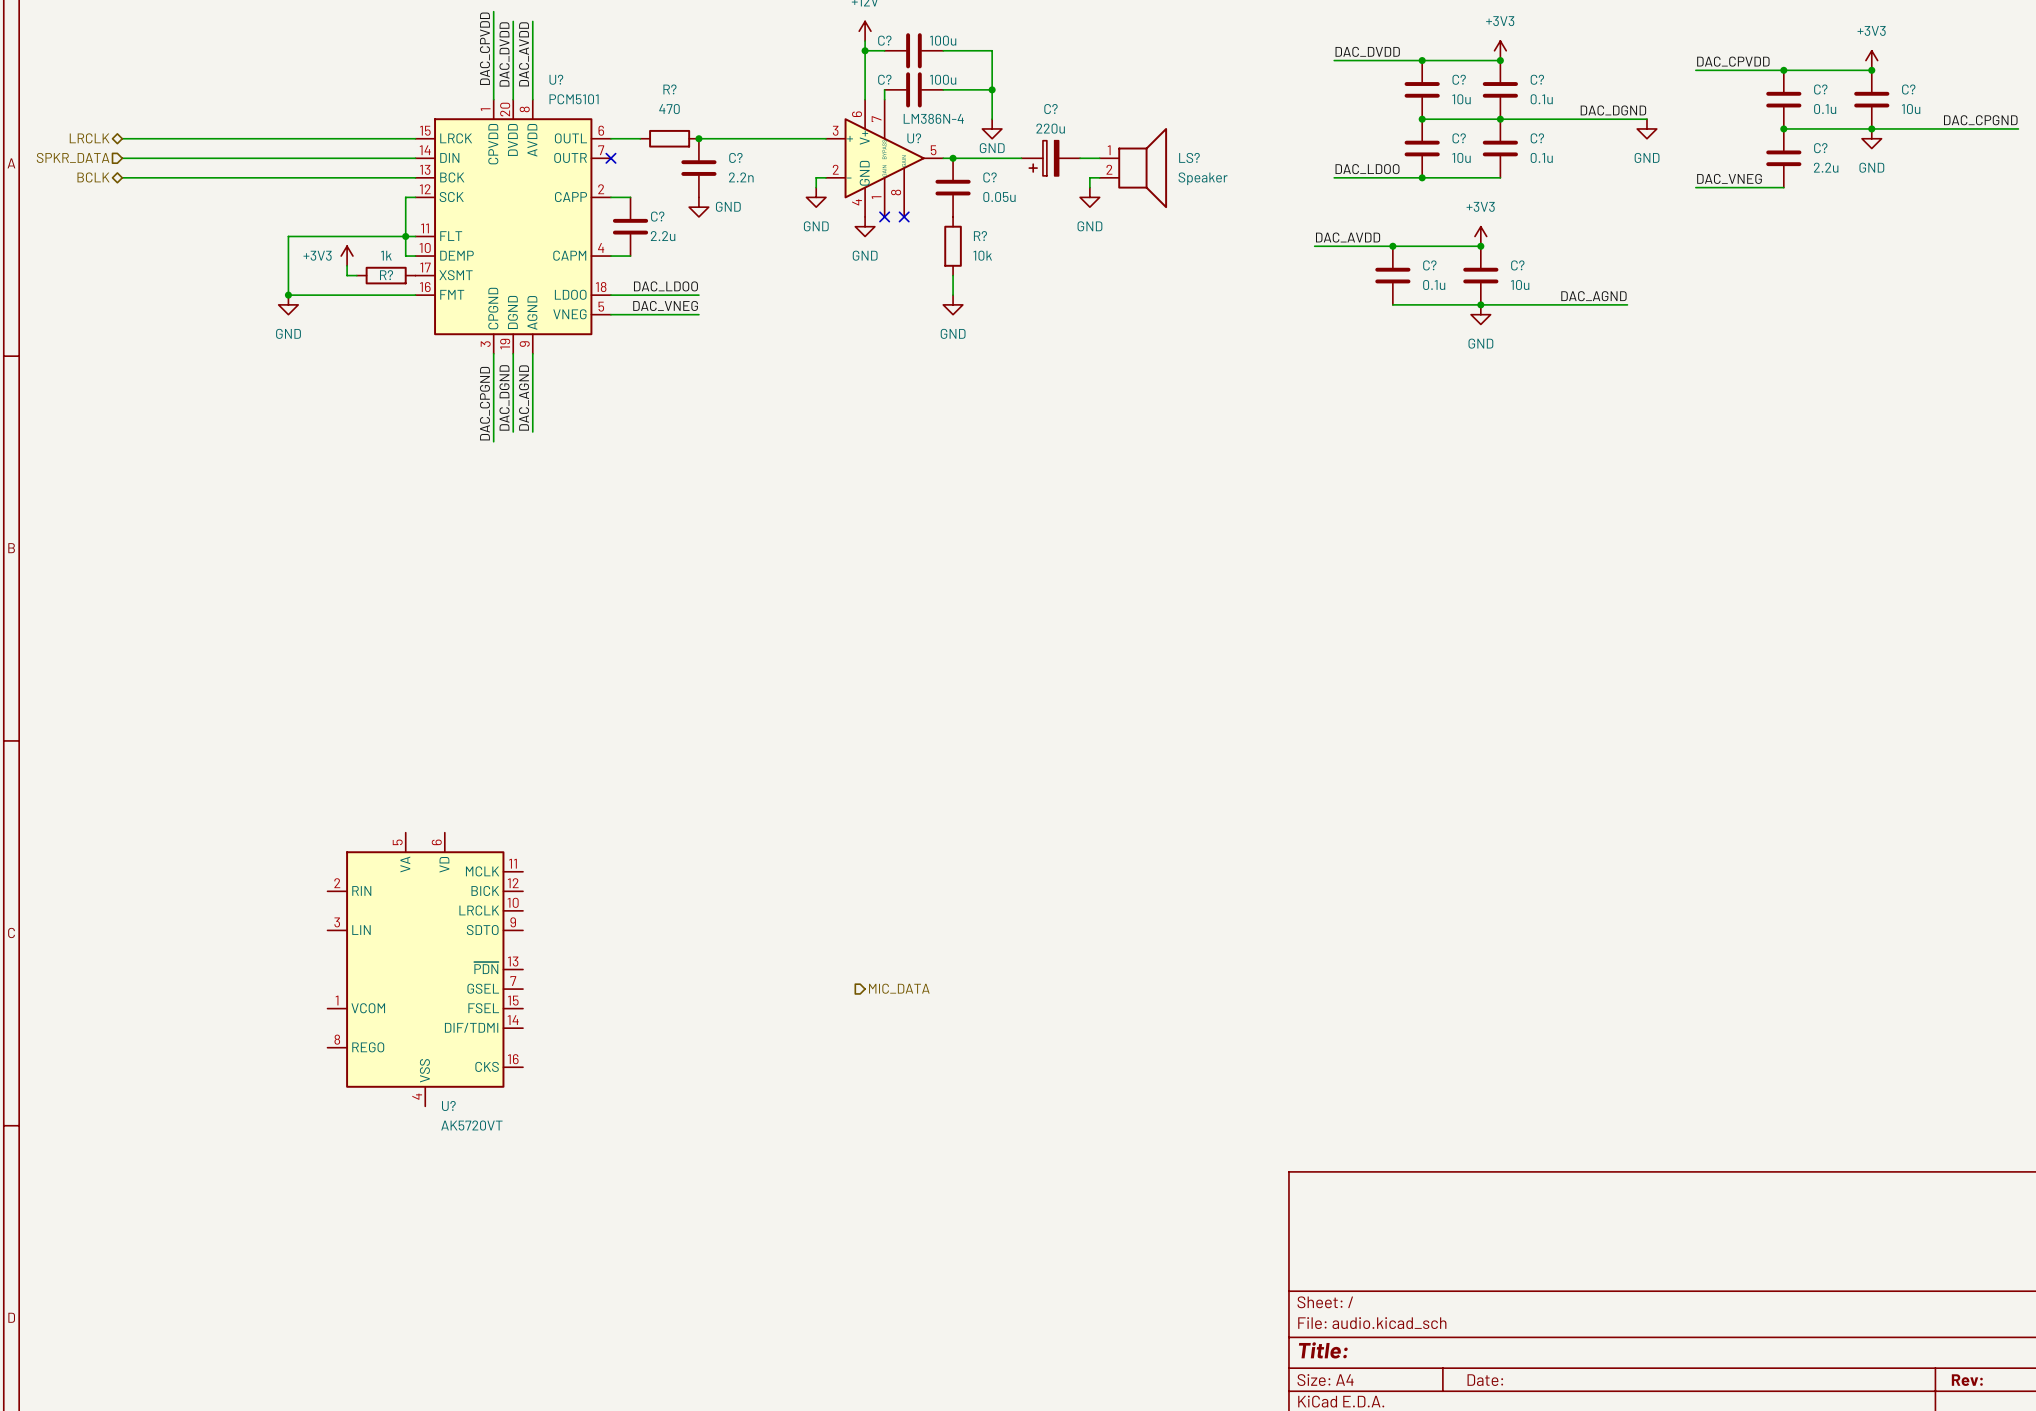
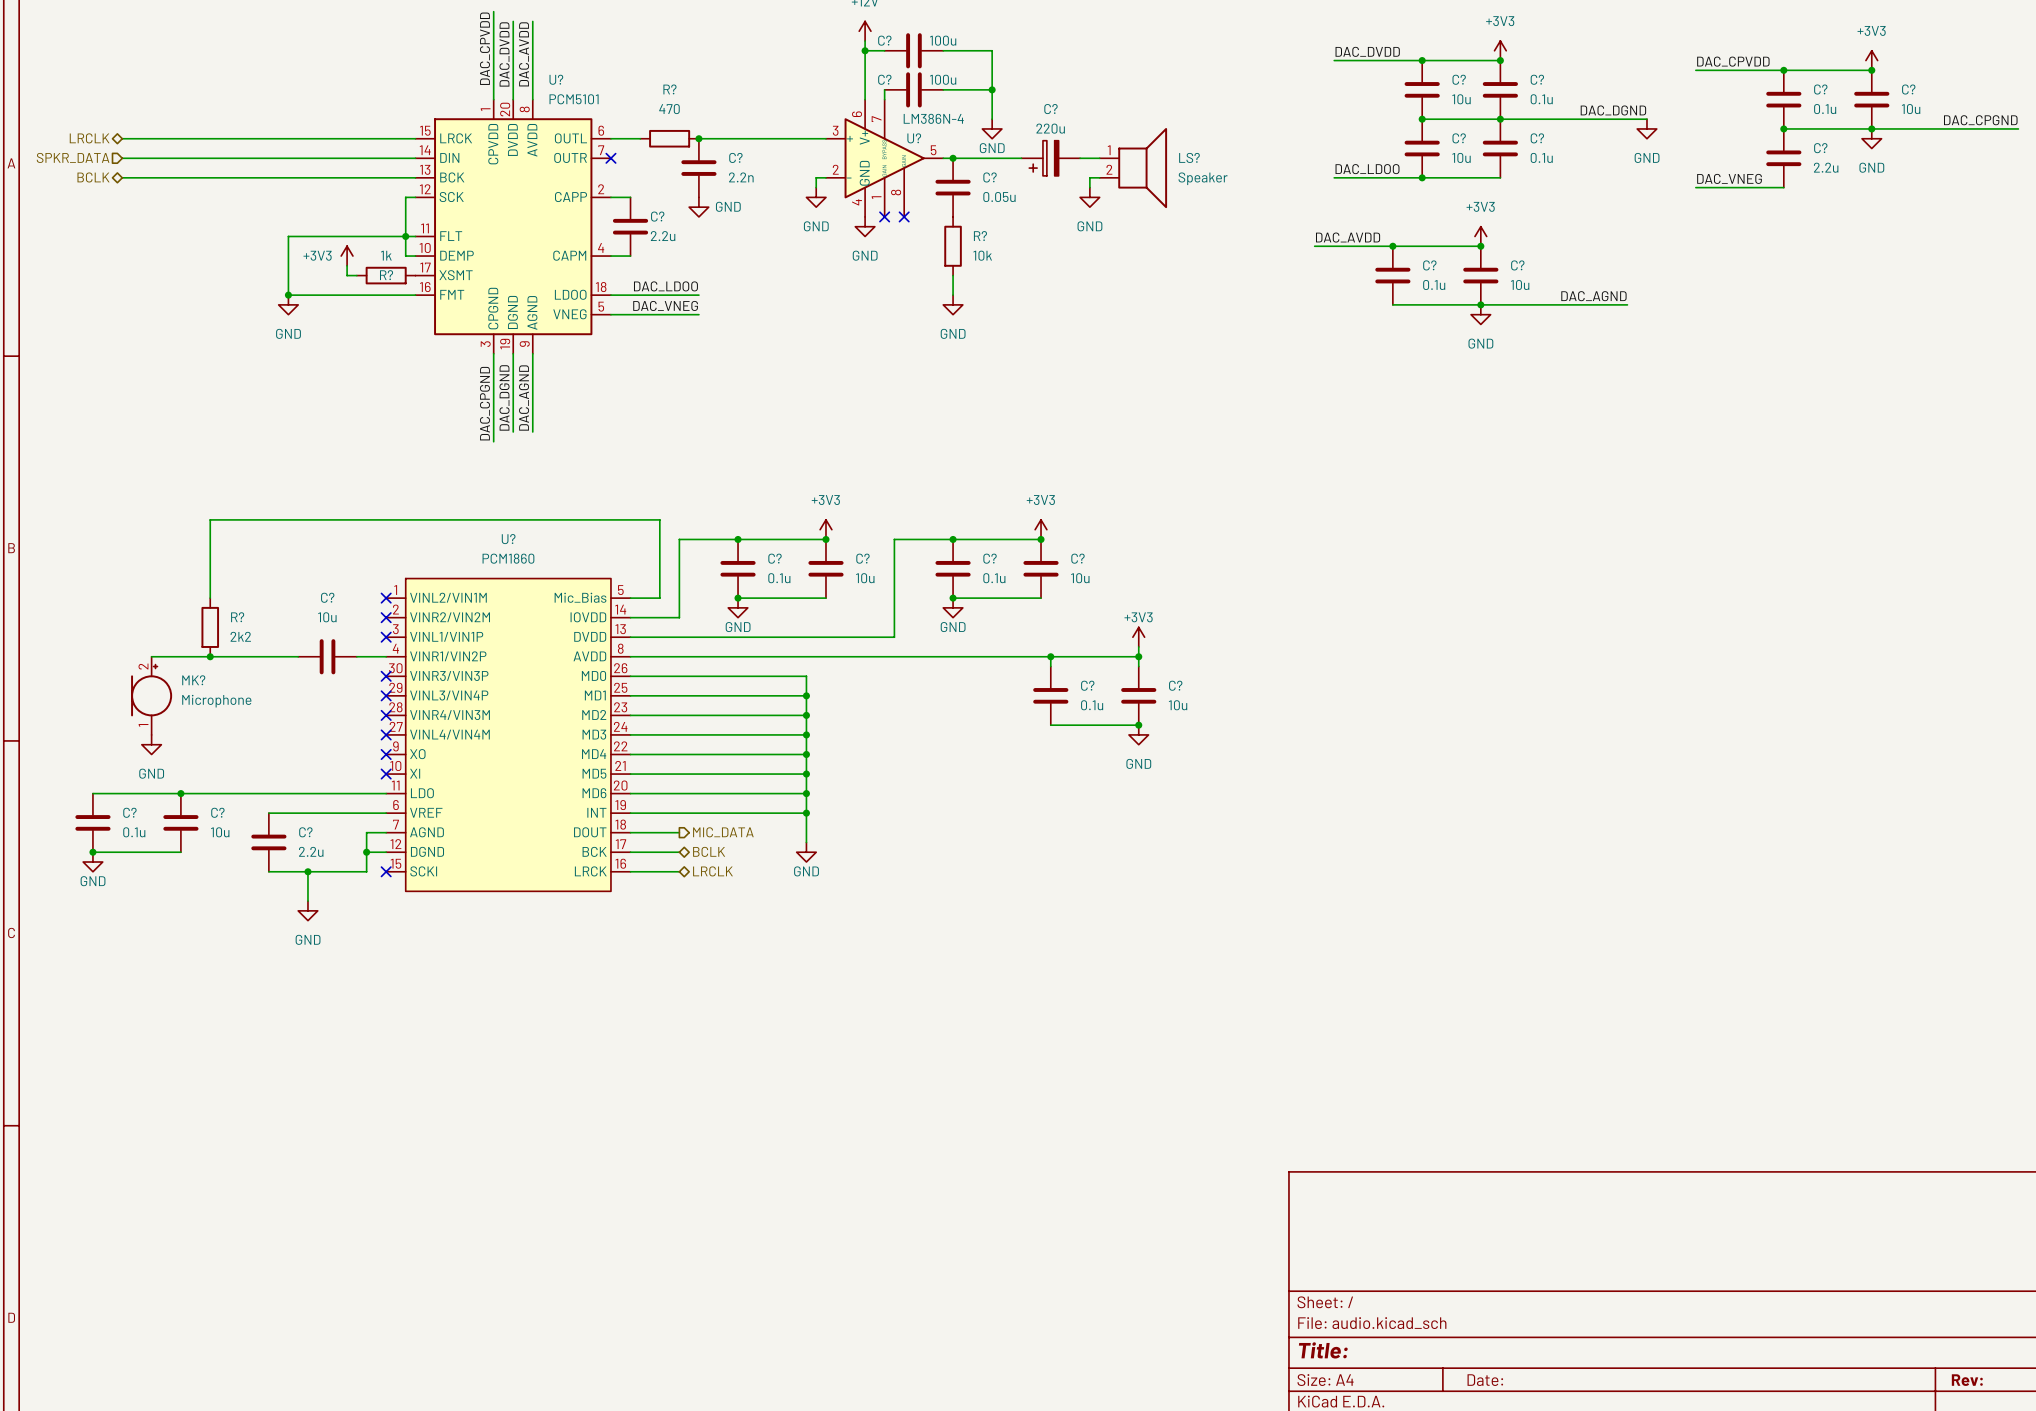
power symbol: none -> +3V3 (825, 529)
power symbol: none -> +3V3 (1041, 529)
junction: none -> (738, 539)
wire: none -> (825, 539) (679, 539) (679, 617) (630, 617)
junction: none -> (825, 539)
junction: none -> (953, 539)
wire: none -> (1041, 539) (894, 539) (894, 637) (630, 637)
junction: none -> (1041, 539)
C?: none -> 0.1u (738, 568)
C?: none -> 10u (825, 568)
C?: none -> 0.1u (953, 568)
C?: none -> 10u (1041, 568)
wire: none -> (210, 598) (210, 519) (659, 519) (659, 598) (630, 598)
no-connect mark: none -> (386, 598)
wire: none -> (738, 598) (825, 598)
junction: none -> (738, 598)
wire: none -> (953, 598) (1041, 598)
junction: none -> (953, 598)
power symbol: none -> GND (738, 607)
power symbol: none -> GND (953, 607)
no-connect mark: none -> (386, 617)
R?: none -> 2k2 (210, 627)
no-connect mark: none -> (386, 637)
power symbol: none -> +3V3 (1138, 637)
wire: none -> (1138, 646) (1138, 666)
wire: none -> (151, 656) (298, 656)
junction: none -> (210, 656)
C?: none -> 10u (327, 656)
wire: none -> (356, 656) (386, 656)
wire: none -> (630, 656) (1138, 656)
wire: none -> (1050, 656) (1050, 666)
junction: none -> (1050, 656)
junction: none -> (1138, 656)
no-connect mark: none -> (386, 676)
wire: none -> (630, 676) (806, 676) (806, 842)
MK?: none -> Microphone (151, 695)
no-connect mark: none -> (386, 695)
wire: none -> (630, 695) (806, 695)
junction: none -> (806, 695)
C?: none -> 0.1u (1050, 695)
C?: none -> 10u (1138, 695)
no-connect mark: none -> (386, 715)
wire: none -> (630, 715) (806, 715)
junction: none -> (806, 715)
wire: none -> (1050, 725) (1138, 725)
junction: none -> (1138, 725)
no-connect mark: none -> (386, 734)
U?: none -> PCM1860 (508, 734)
wire: none -> (630, 734) (806, 734)
junction: none -> (806, 734)
power symbol: none -> GND (1138, 734)
power symbol: none -> GND (151, 744)
no-connect mark: none -> (386, 754)
wire: none -> (630, 754) (806, 754)
junction: none -> (806, 754)
no-connect mark: none -> (386, 774)
wire: none -> (630, 774) (806, 774)
junction: none -> (806, 774)
wire: none -> (92, 793) (386, 793)
junction: none -> (180, 793)
wire: none -> (630, 793) (806, 793)
junction: none -> (806, 793)
wire: none -> (268, 813) (386, 813)
wire: none -> (630, 813) (806, 813)
junction: none -> (806, 813)
C?: none -> 0.1u (92, 822)
C?: none -> 10u (180, 822)
wire: none -> (386, 832) (366, 832) (366, 871) (268, 871)
wire: none -> (630, 832) (679, 832)
hierarchical label: none -> MIC_DATA (723, 832)
C?: none -> 2.2u (268, 842)
hierarchical label: none -> BCLK (709, 851)
wire: none -> (92, 852) (180, 852)
junction: none -> (92, 852)
junction: none -> (366, 852)
wire: none -> (630, 852) (679, 852)
power symbol: none -> GND (806, 852)
power symbol: none -> GND (92, 862)
wire: none -> (307, 871) (307, 901)
junction: none -> (307, 871)
no-connect mark: none -> (386, 871)
wire: none -> (630, 871) (679, 871)
hierarchical label: none -> LRCLK (712, 871)
power symbol: none -> GND (307, 910)
U?: AK5720VT (425, 969) -> none
hierarchical label: MIC_DATA (899, 988) -> none

